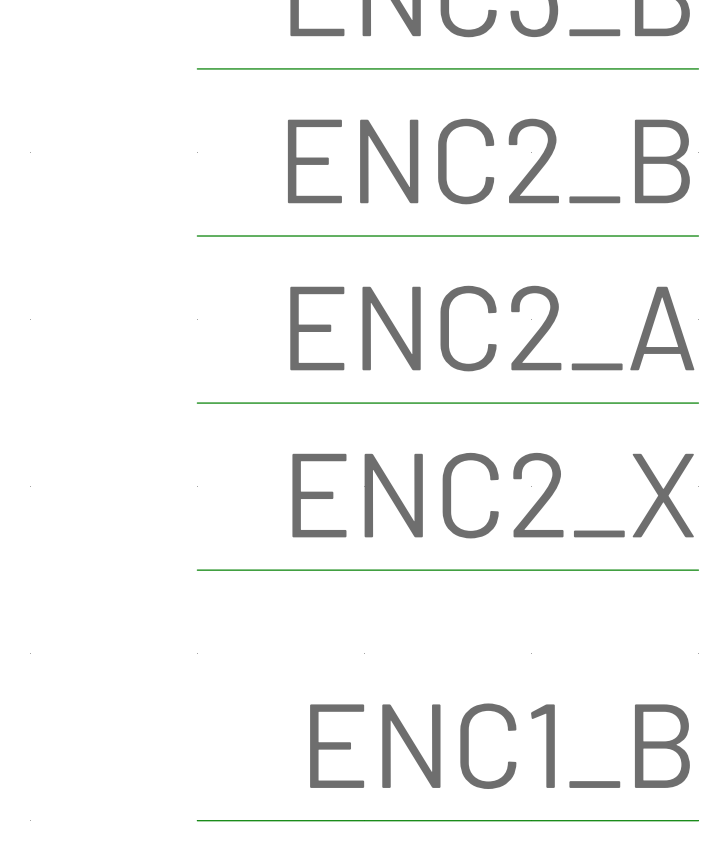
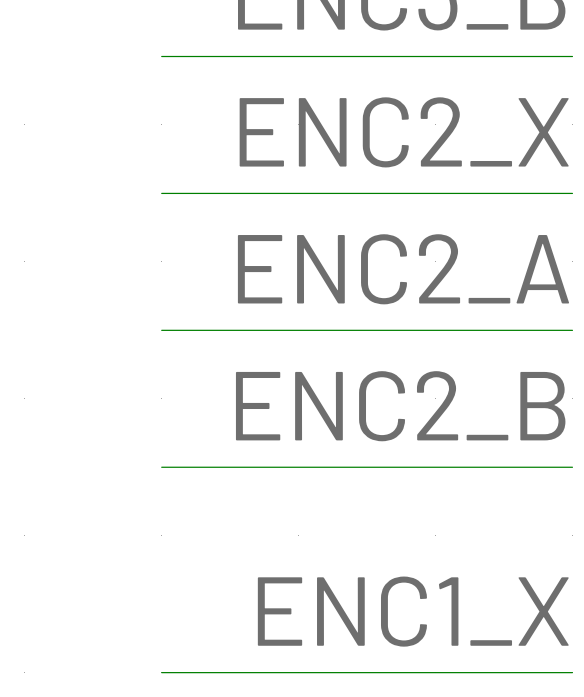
label: ENC2_B (488, 161) -> ENC2_X (404, 132)
label: ENC2_X (493, 495) -> ENC2_B (400, 406)
label: ENC1_B (499, 746) -> ENC1_X (413, 611)

